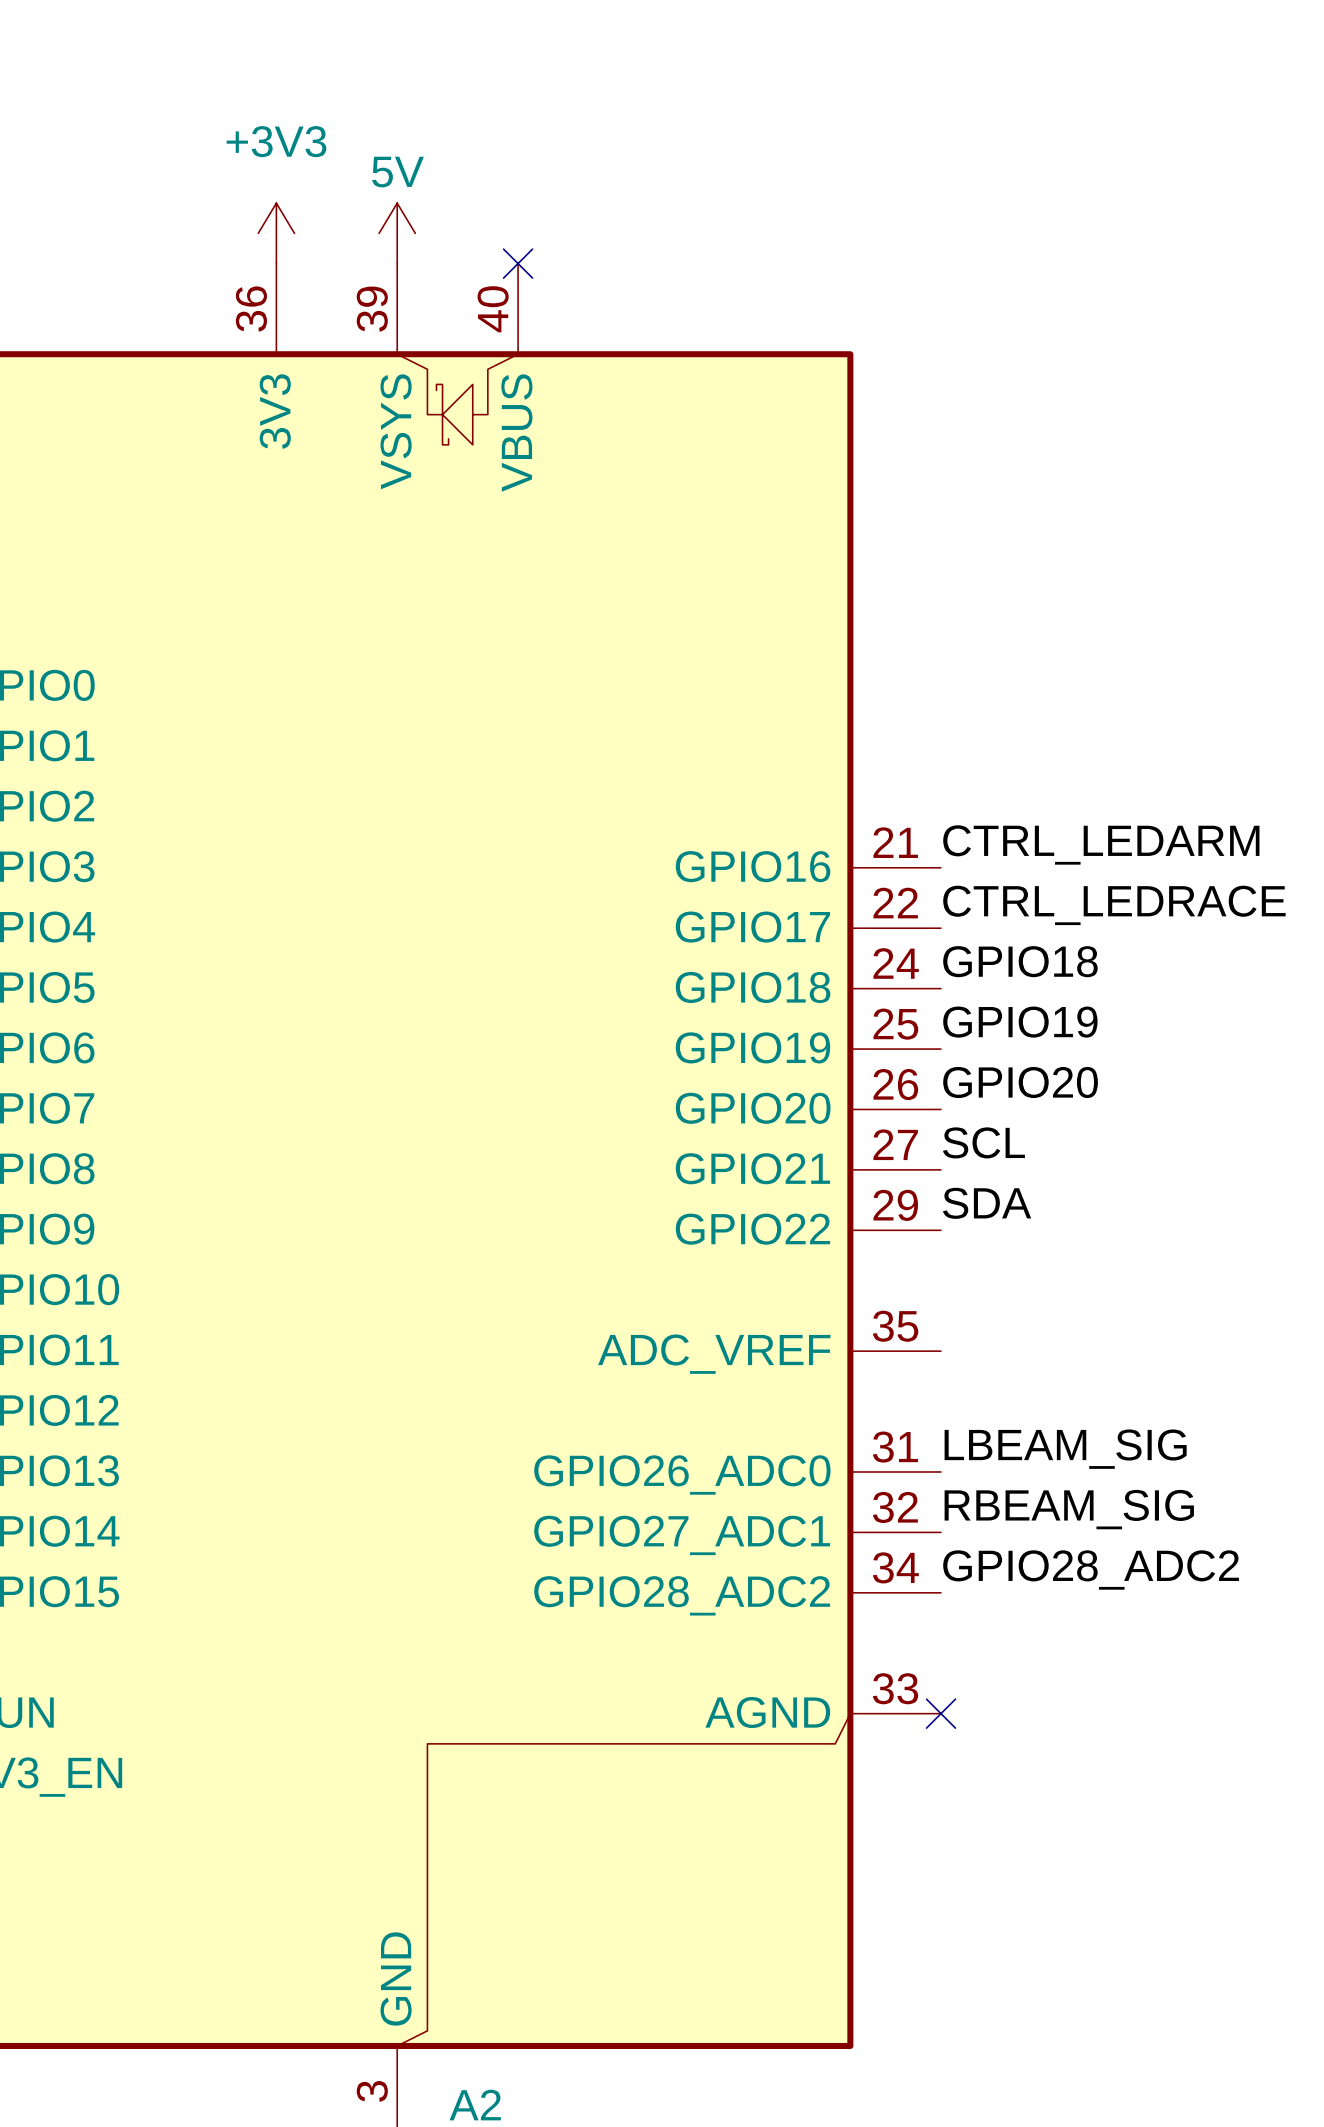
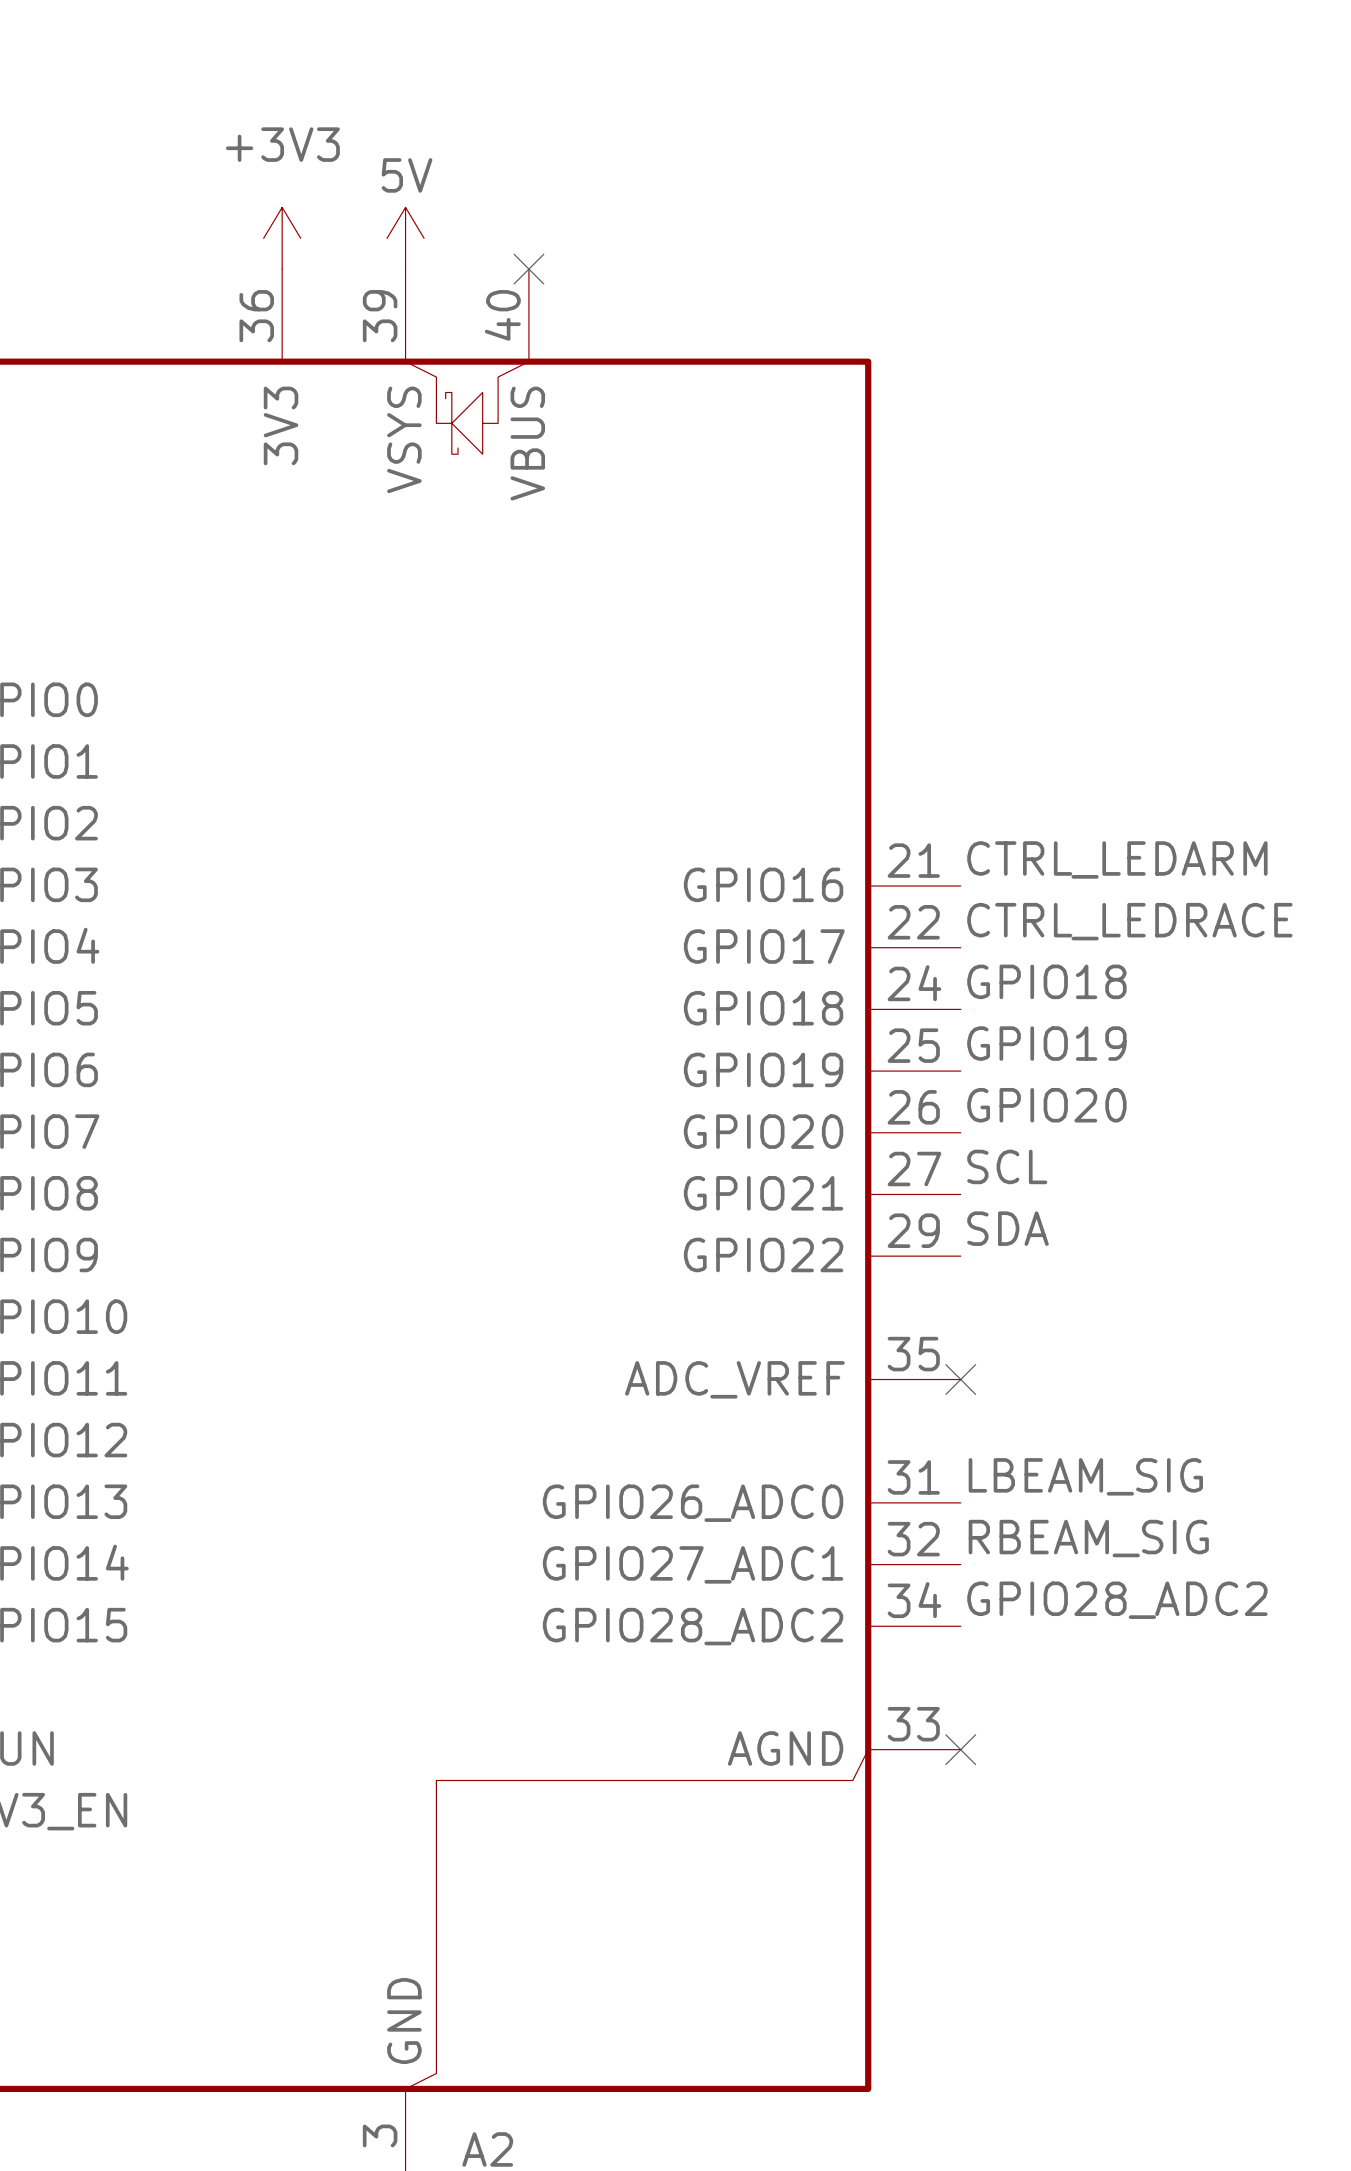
no-connect mark: none -> (960, 1379)

